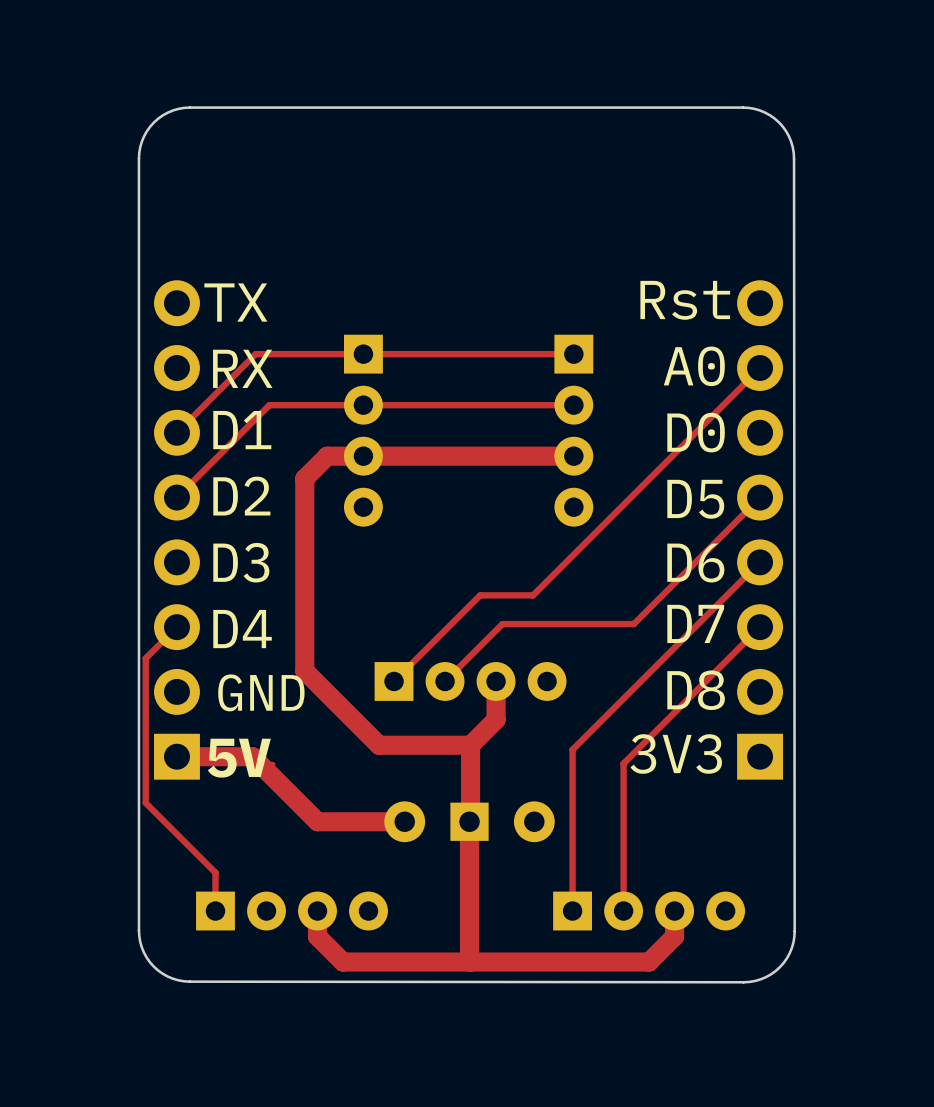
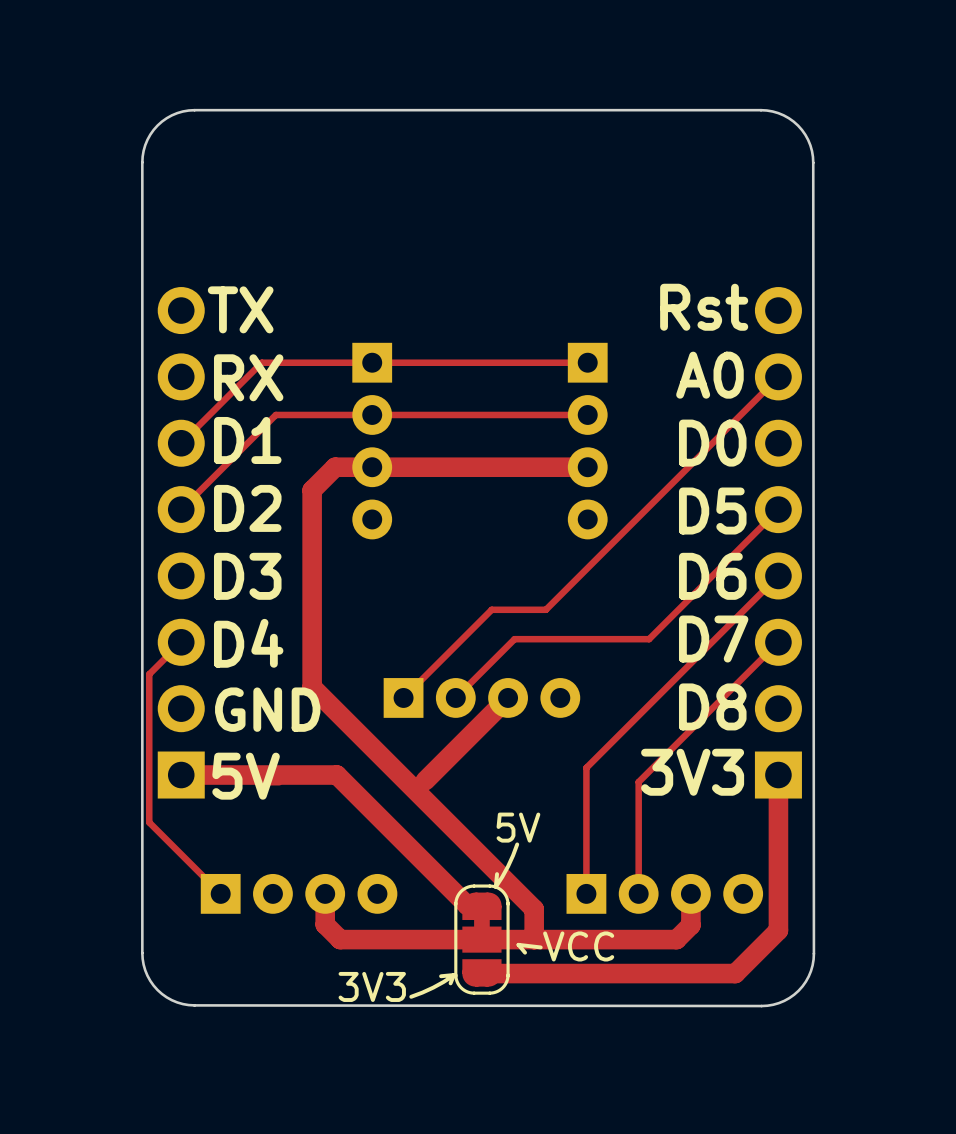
track: (496, 681) (496, 719) (470, 745) -> (508, 697) (425, 780)
track: (379, 745) (470, 745) -> (388, 763) (534, 909) (534, 939)
track: (470, 745) (470, 962) -> none
track: (252, 756) (317, 821) (404, 821) -> (258, 775) (336, 775) (467, 905) (481, 905)
track: none -> (778, 775) (778, 930) (735, 973) (481, 973)
part: (469, 821) -> none
line: none -> (517, 844) (508, 866) (495, 886) (497, 874)
track: (215, 872) (215, 911) -> none
track: none -> (325, 893) (325, 924) (340, 939) (676, 939) (690, 925) (690, 893)
track: (572, 872) (572, 911) -> none
track: (623, 872) (623, 911) -> none
part position: (292, 911) -> (299, 893)
track: (317, 911) (317, 936) (343, 962) (649, 962) (674, 936) (674, 911) -> none
part position: (649, 911) -> (664, 893)
VCC: none -> (481, 939)
line: none -> (540, 947) (518, 944) (525, 952)
line: none -> (453, 975) (433, 987) (411, 996)
line: none -> (441, 976) (453, 975) (450, 983)

